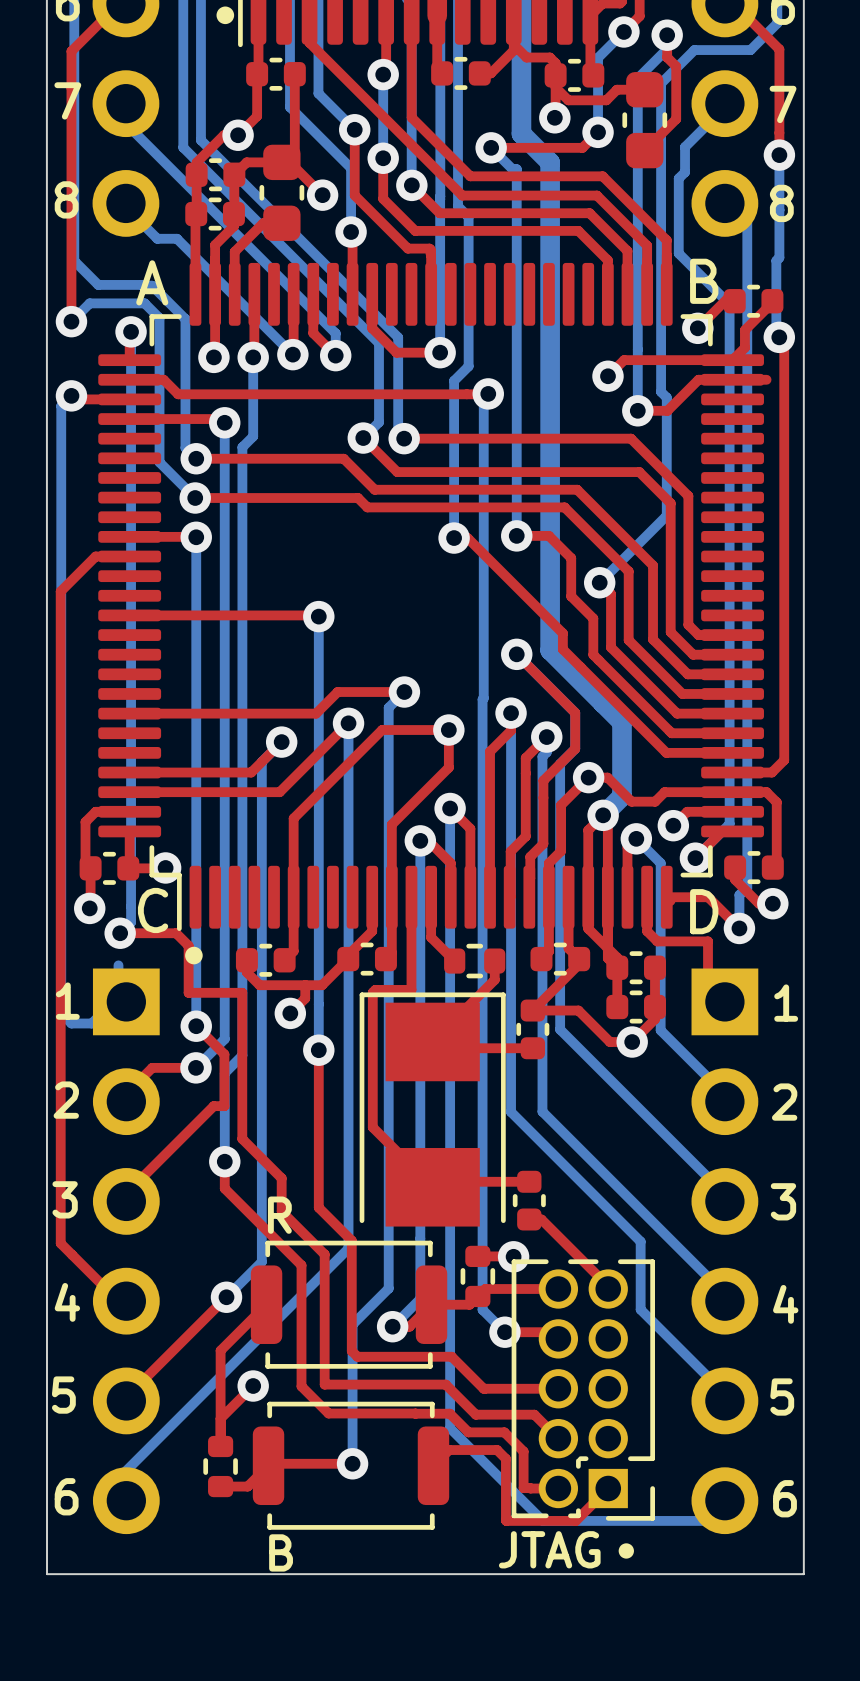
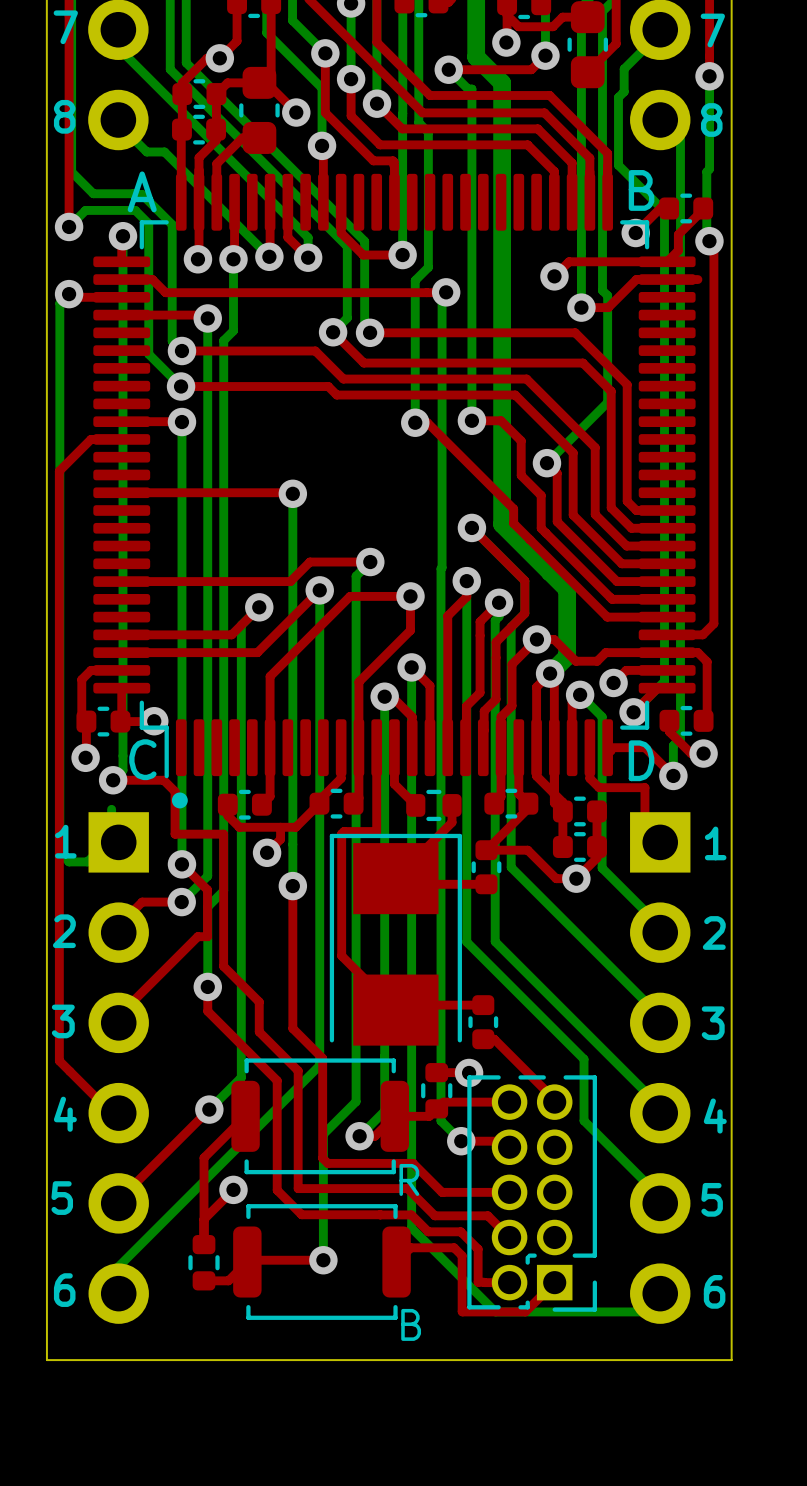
text position: R (279, 1215) -> R (409, 1179)
drawing: [618, 1543, 634, 1559] -> none
text: JTAG (549, 1549) -> none
text position: B (281, 1552) -> B (411, 1324)

